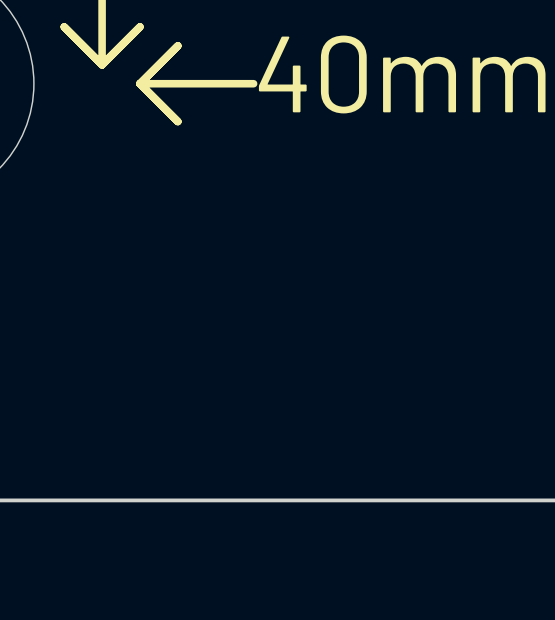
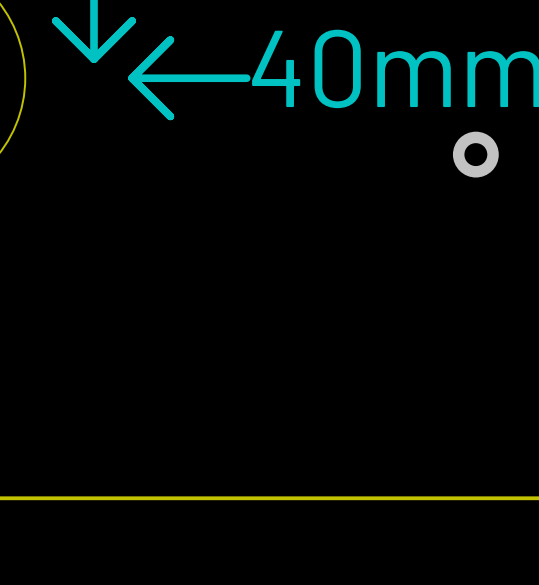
via: none -> (475, 154)

